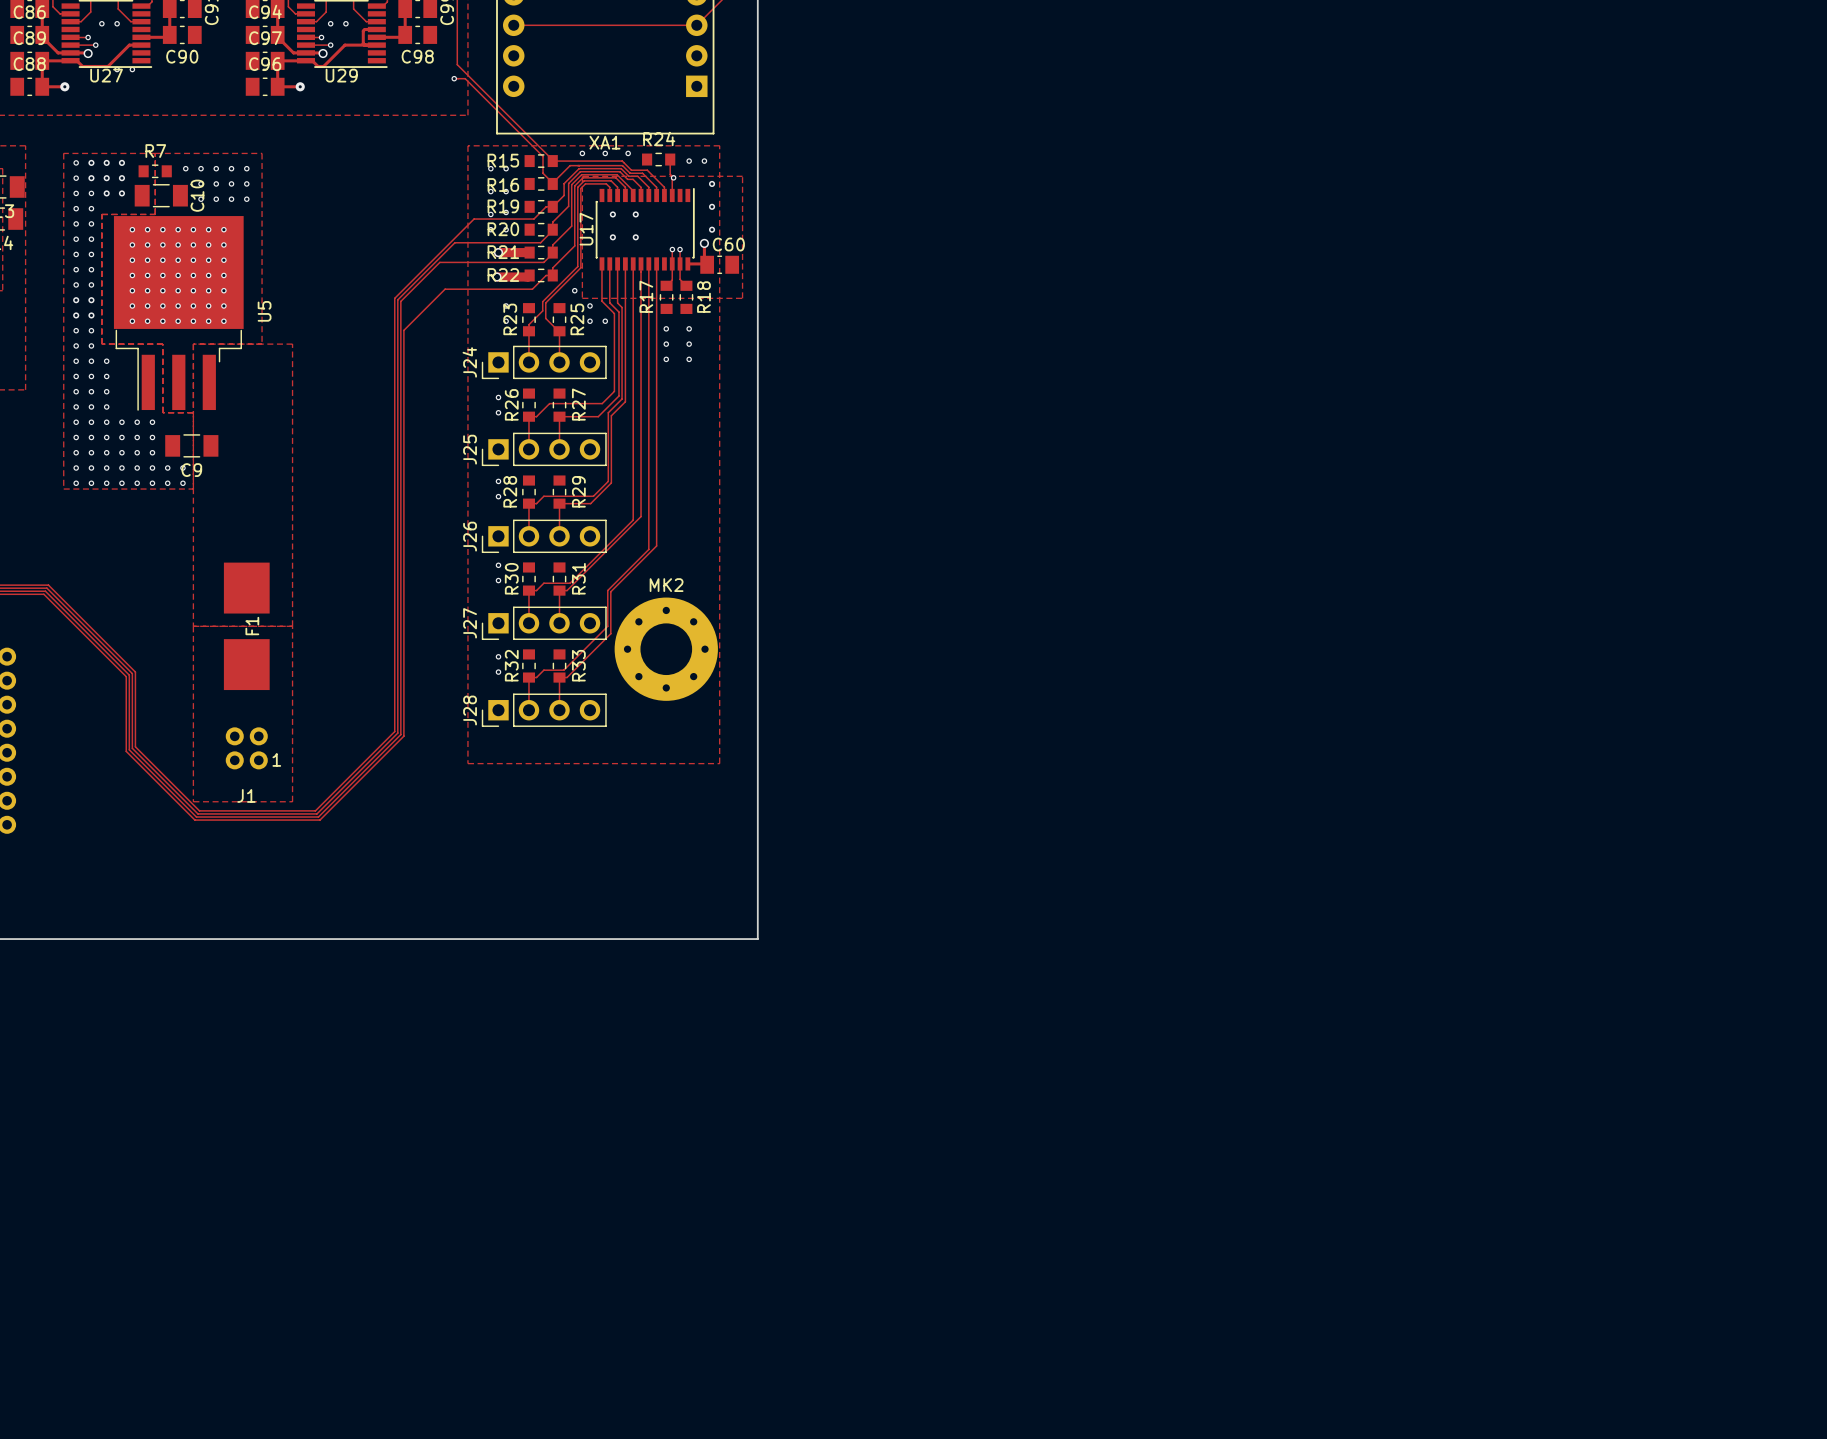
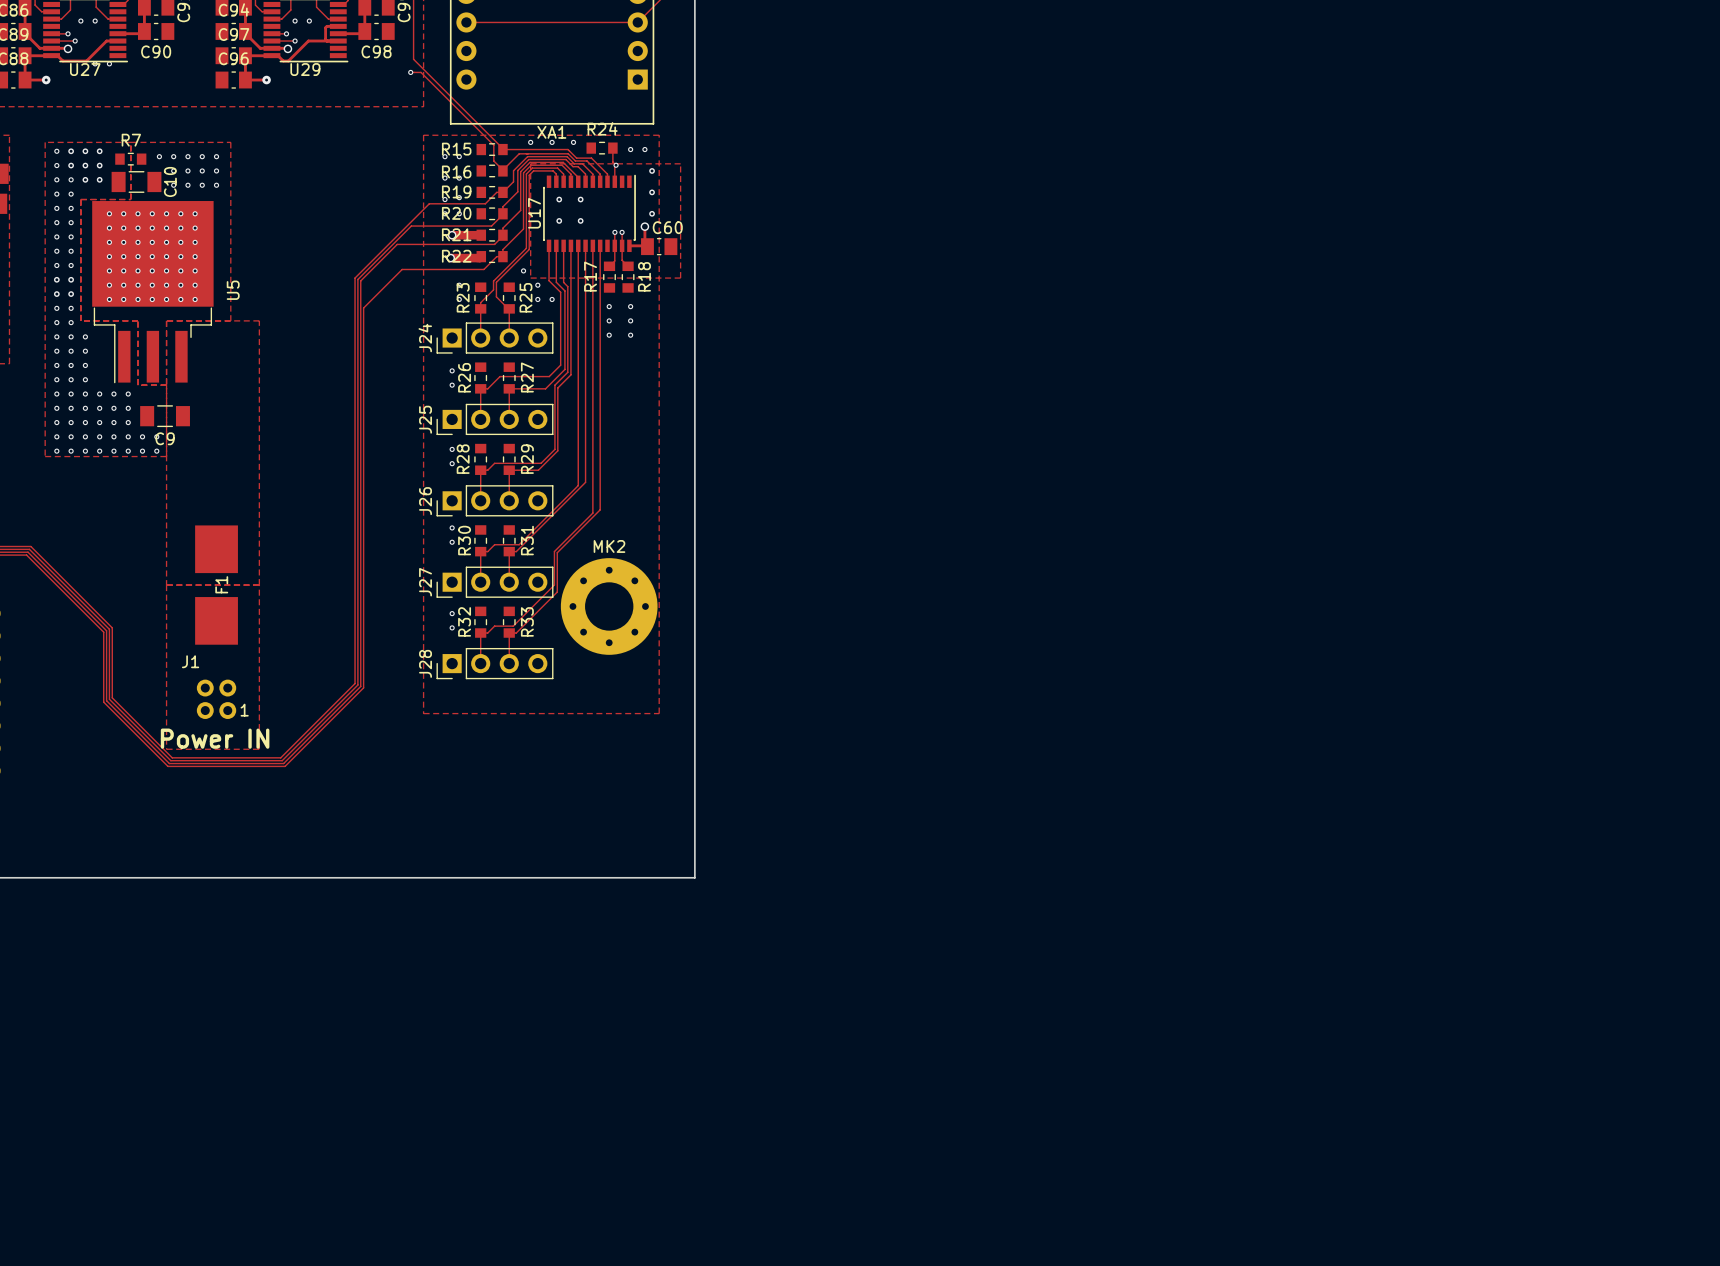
text: none -> Power IN (215, 738)
J1 name position: J1 (246, 795) -> J1 (190, 661)

